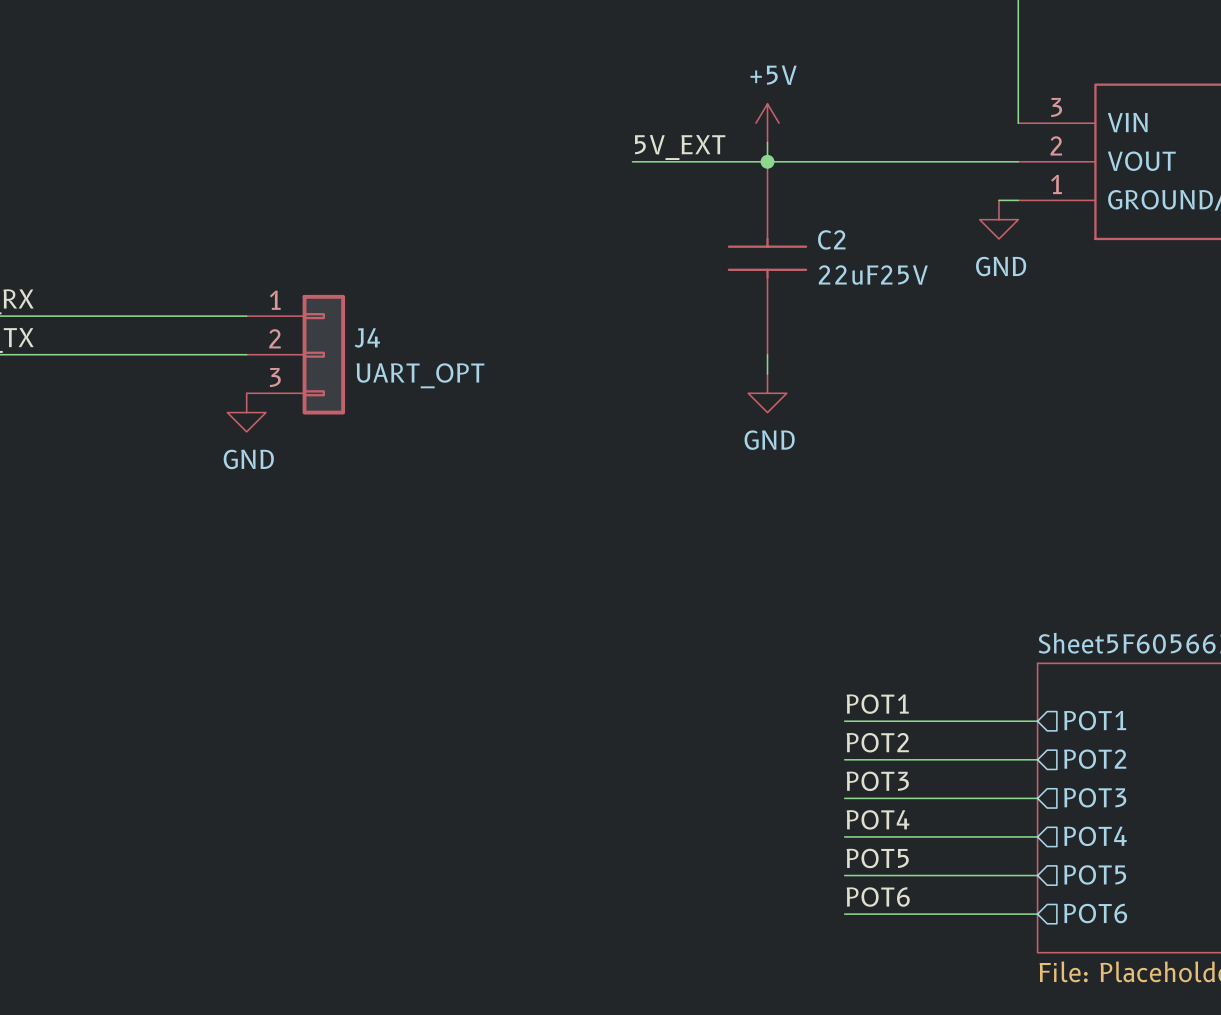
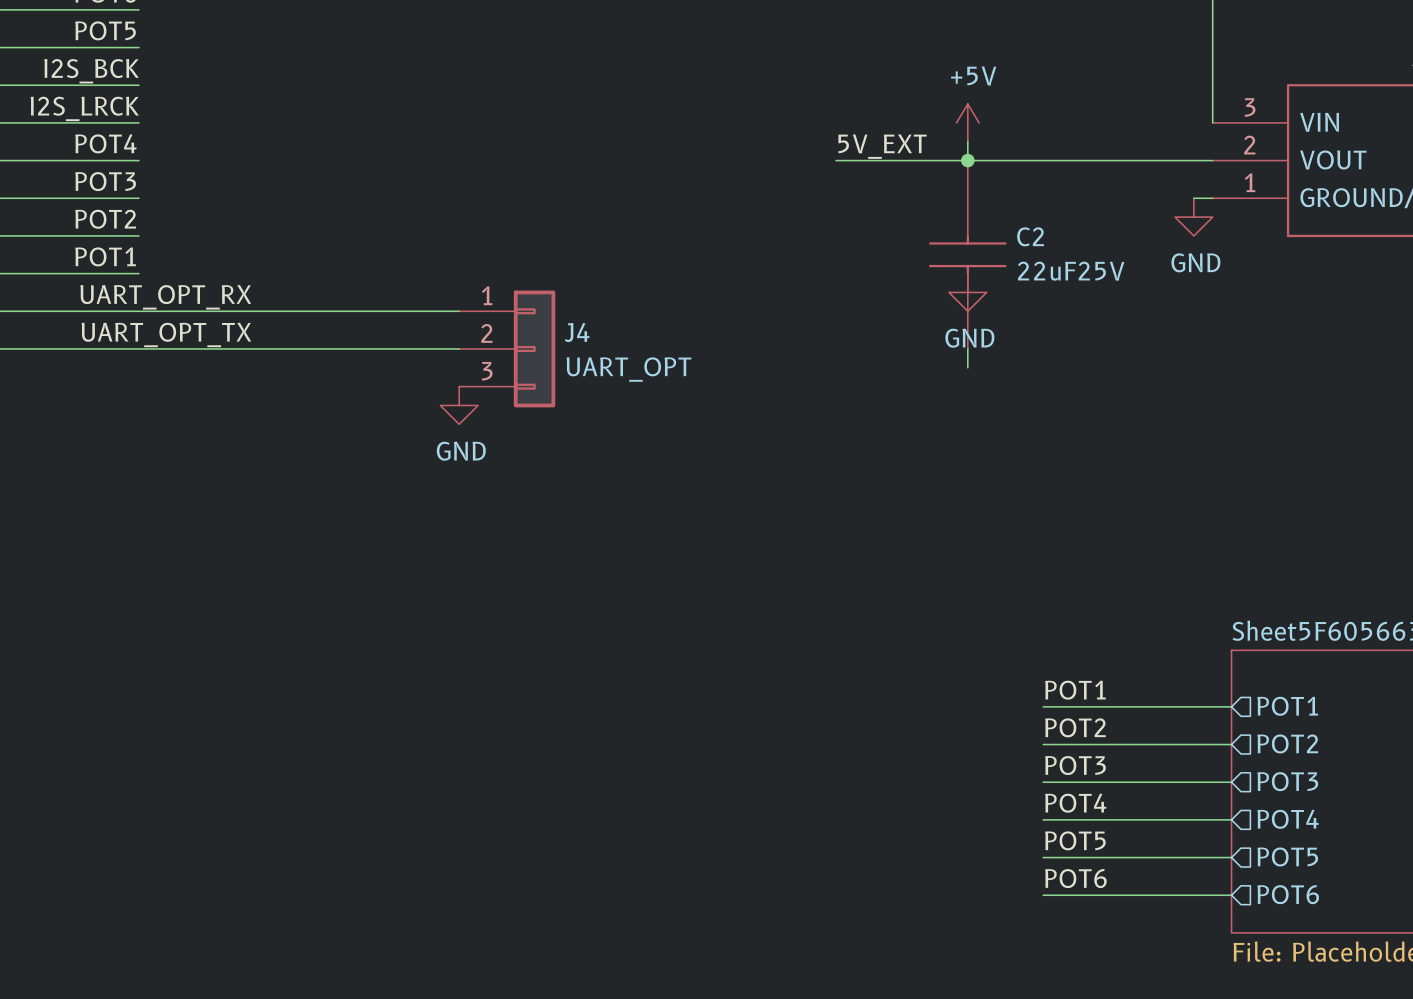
power symbol position: GND (767, 393) -> GND (967, 292)

